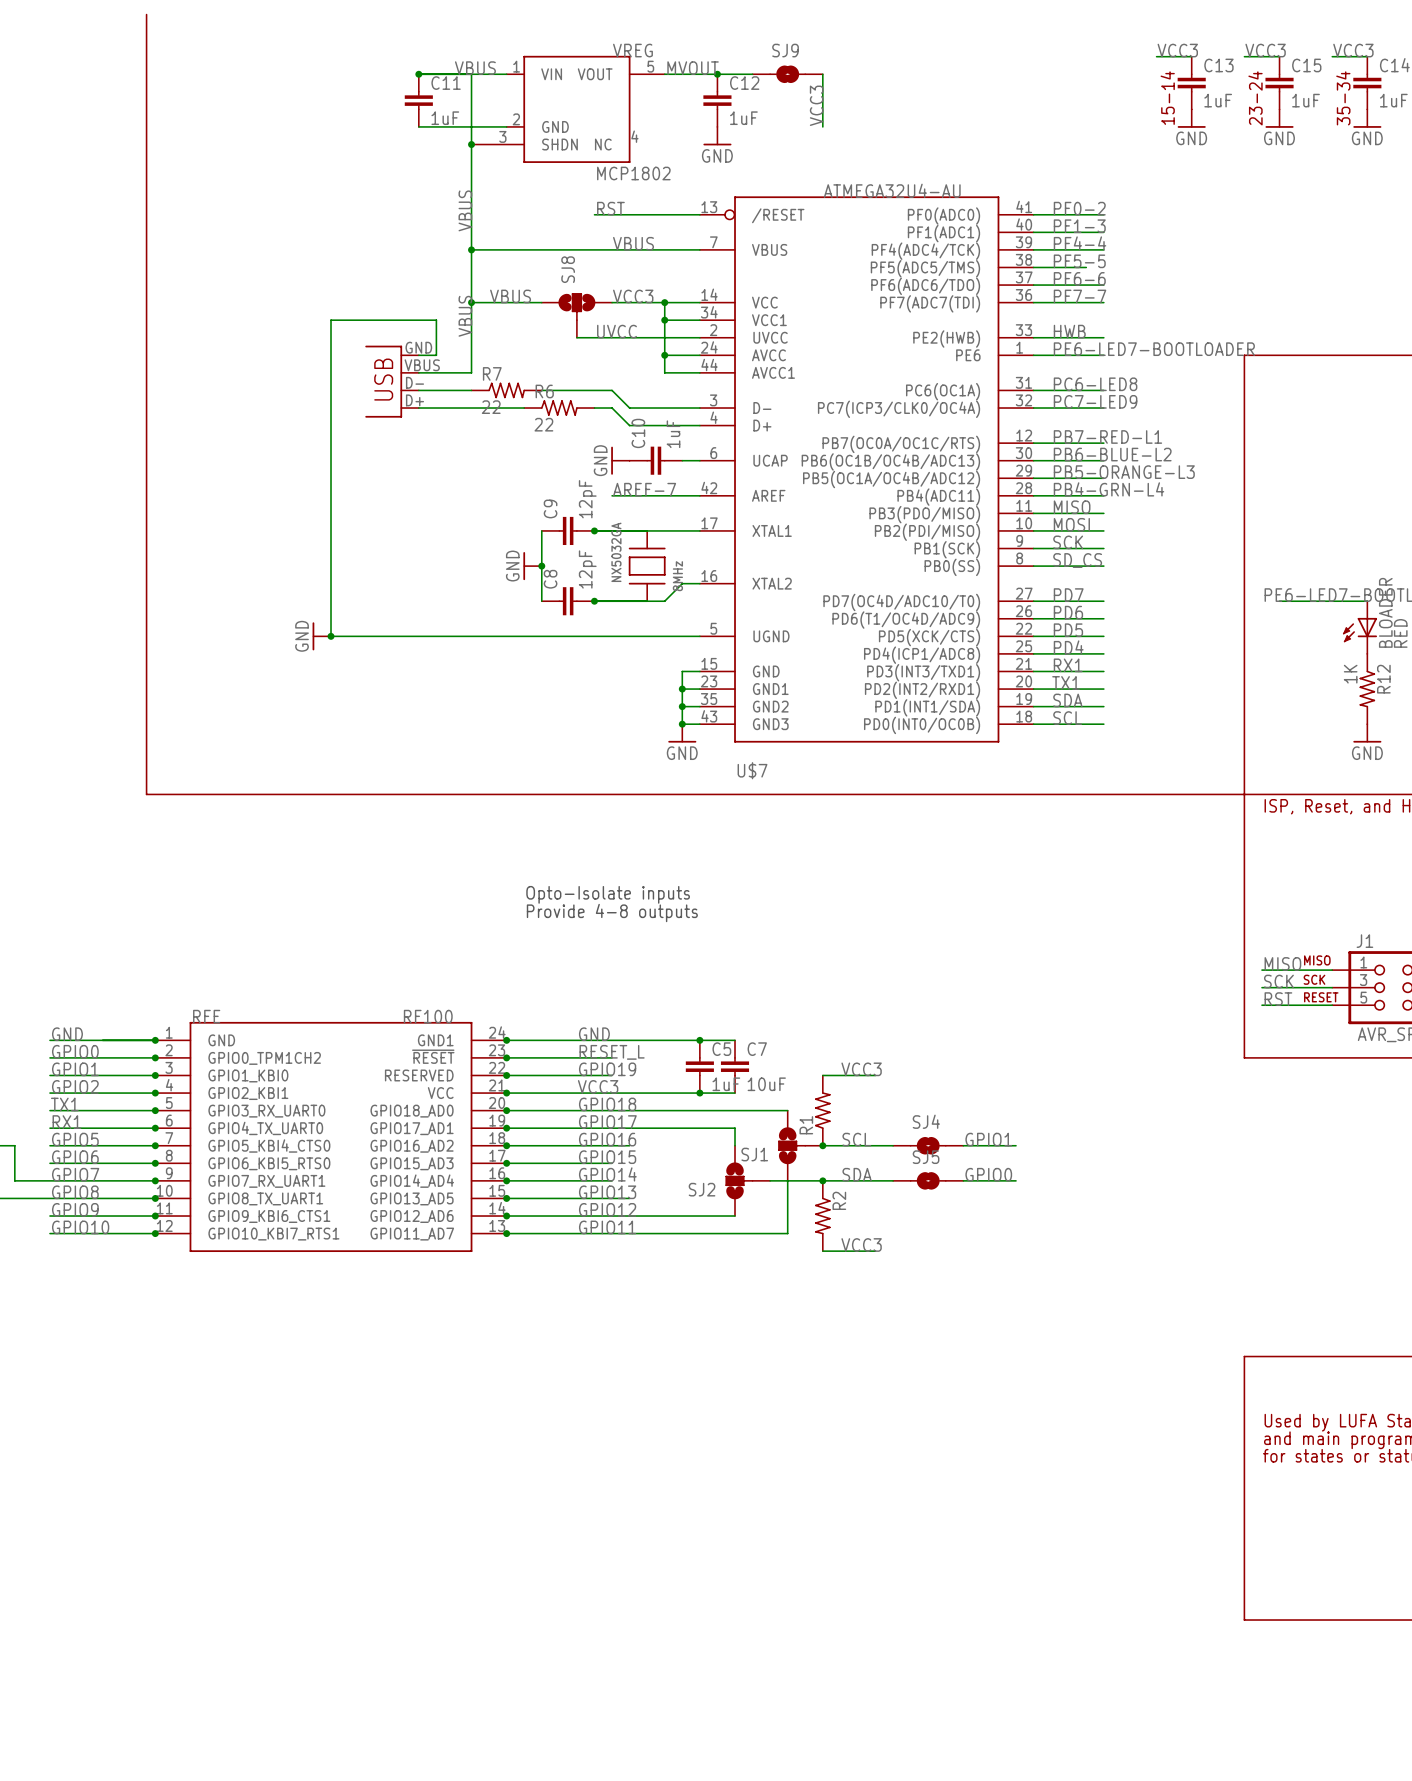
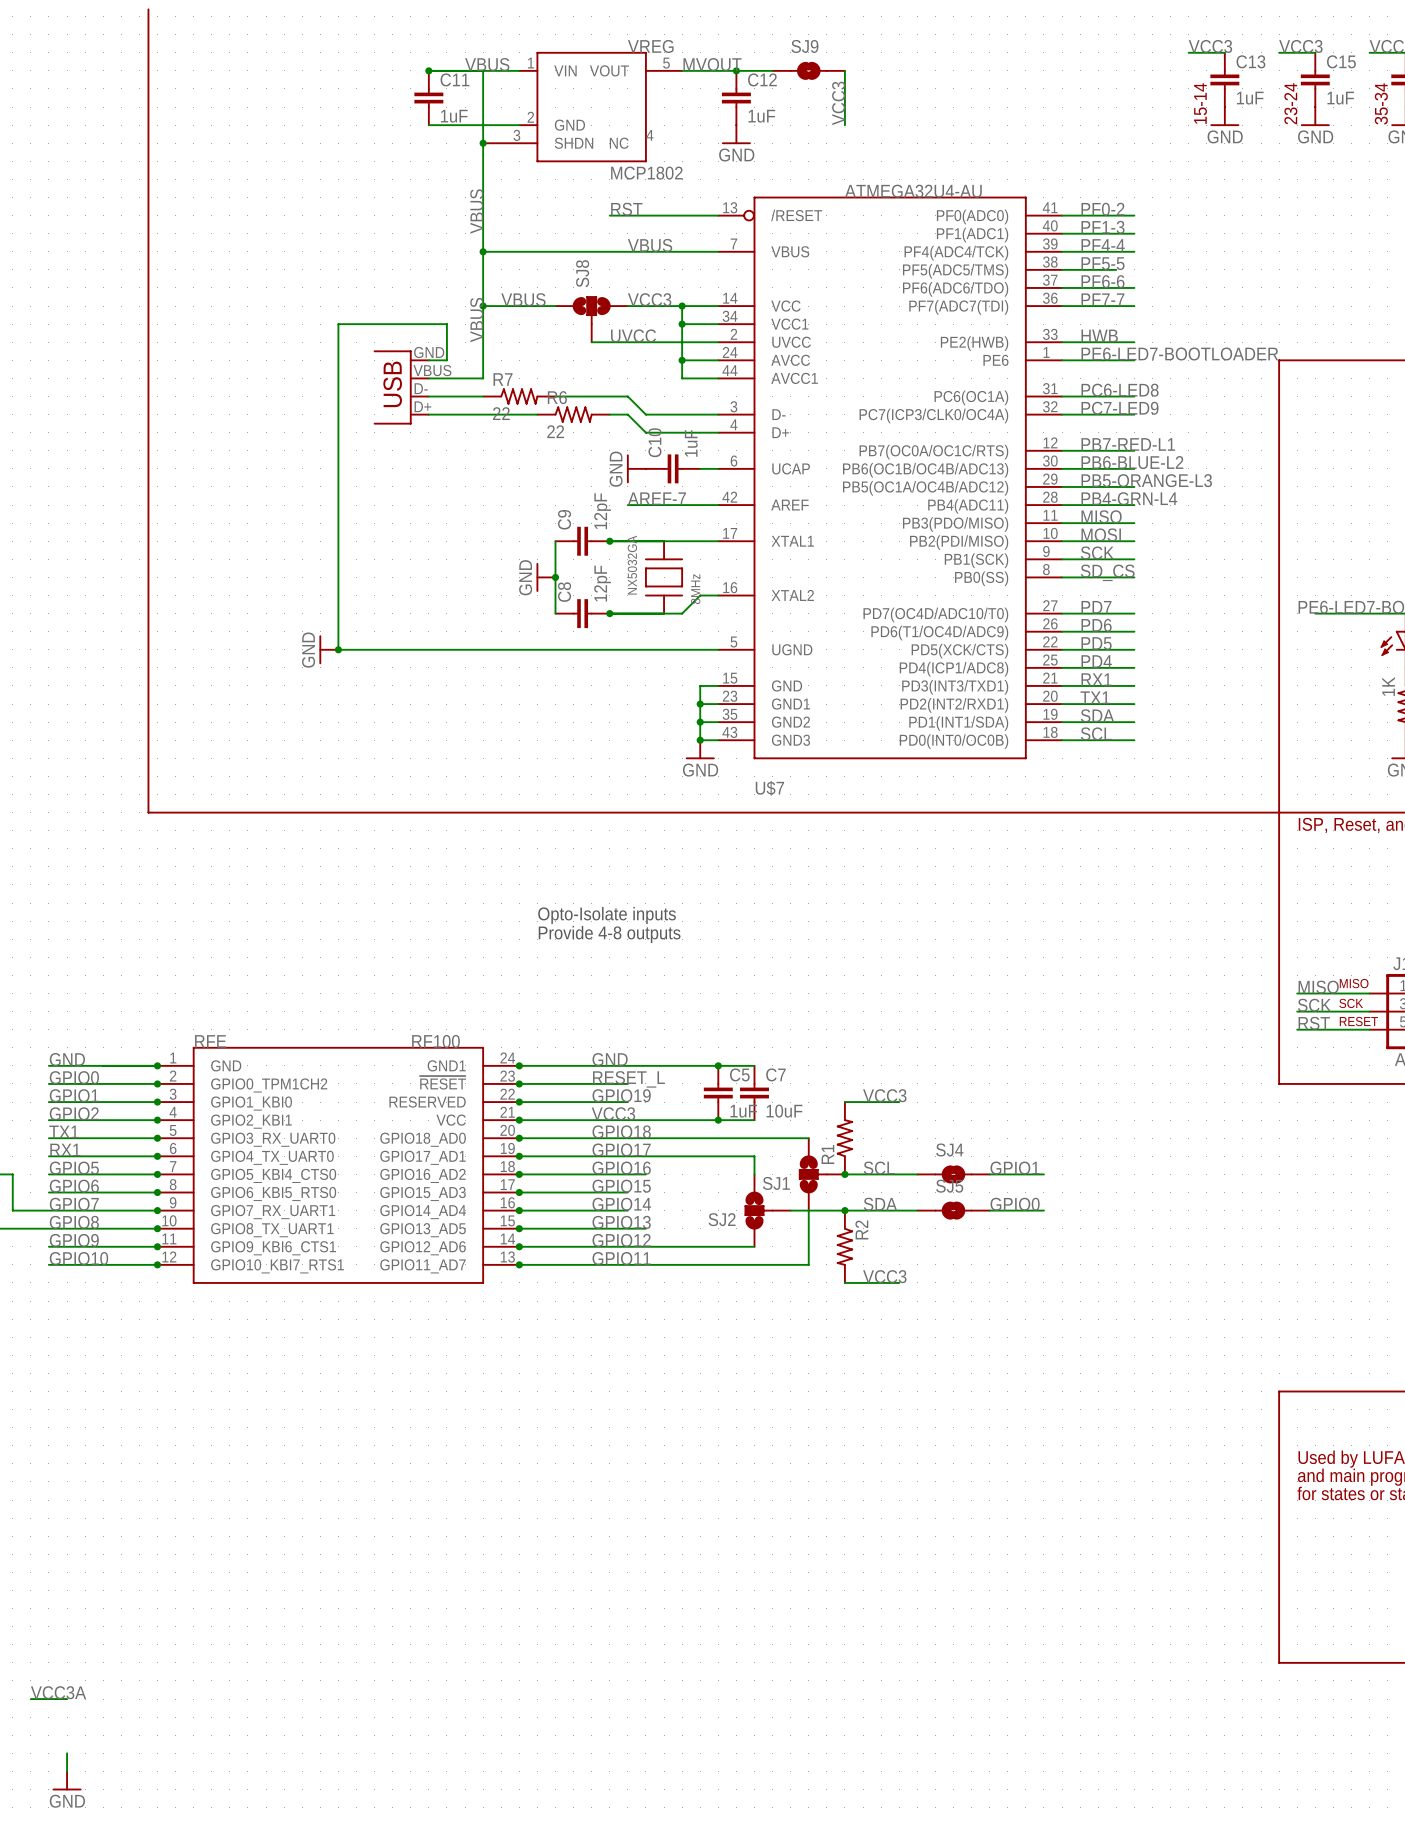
label: none -> VCC3A (58, 1692)
wire: none -> (30, 1699) (67, 1699)
wire: none -> (67, 1753) (67, 1771)
power symbol: none -> GND (67, 1780)

